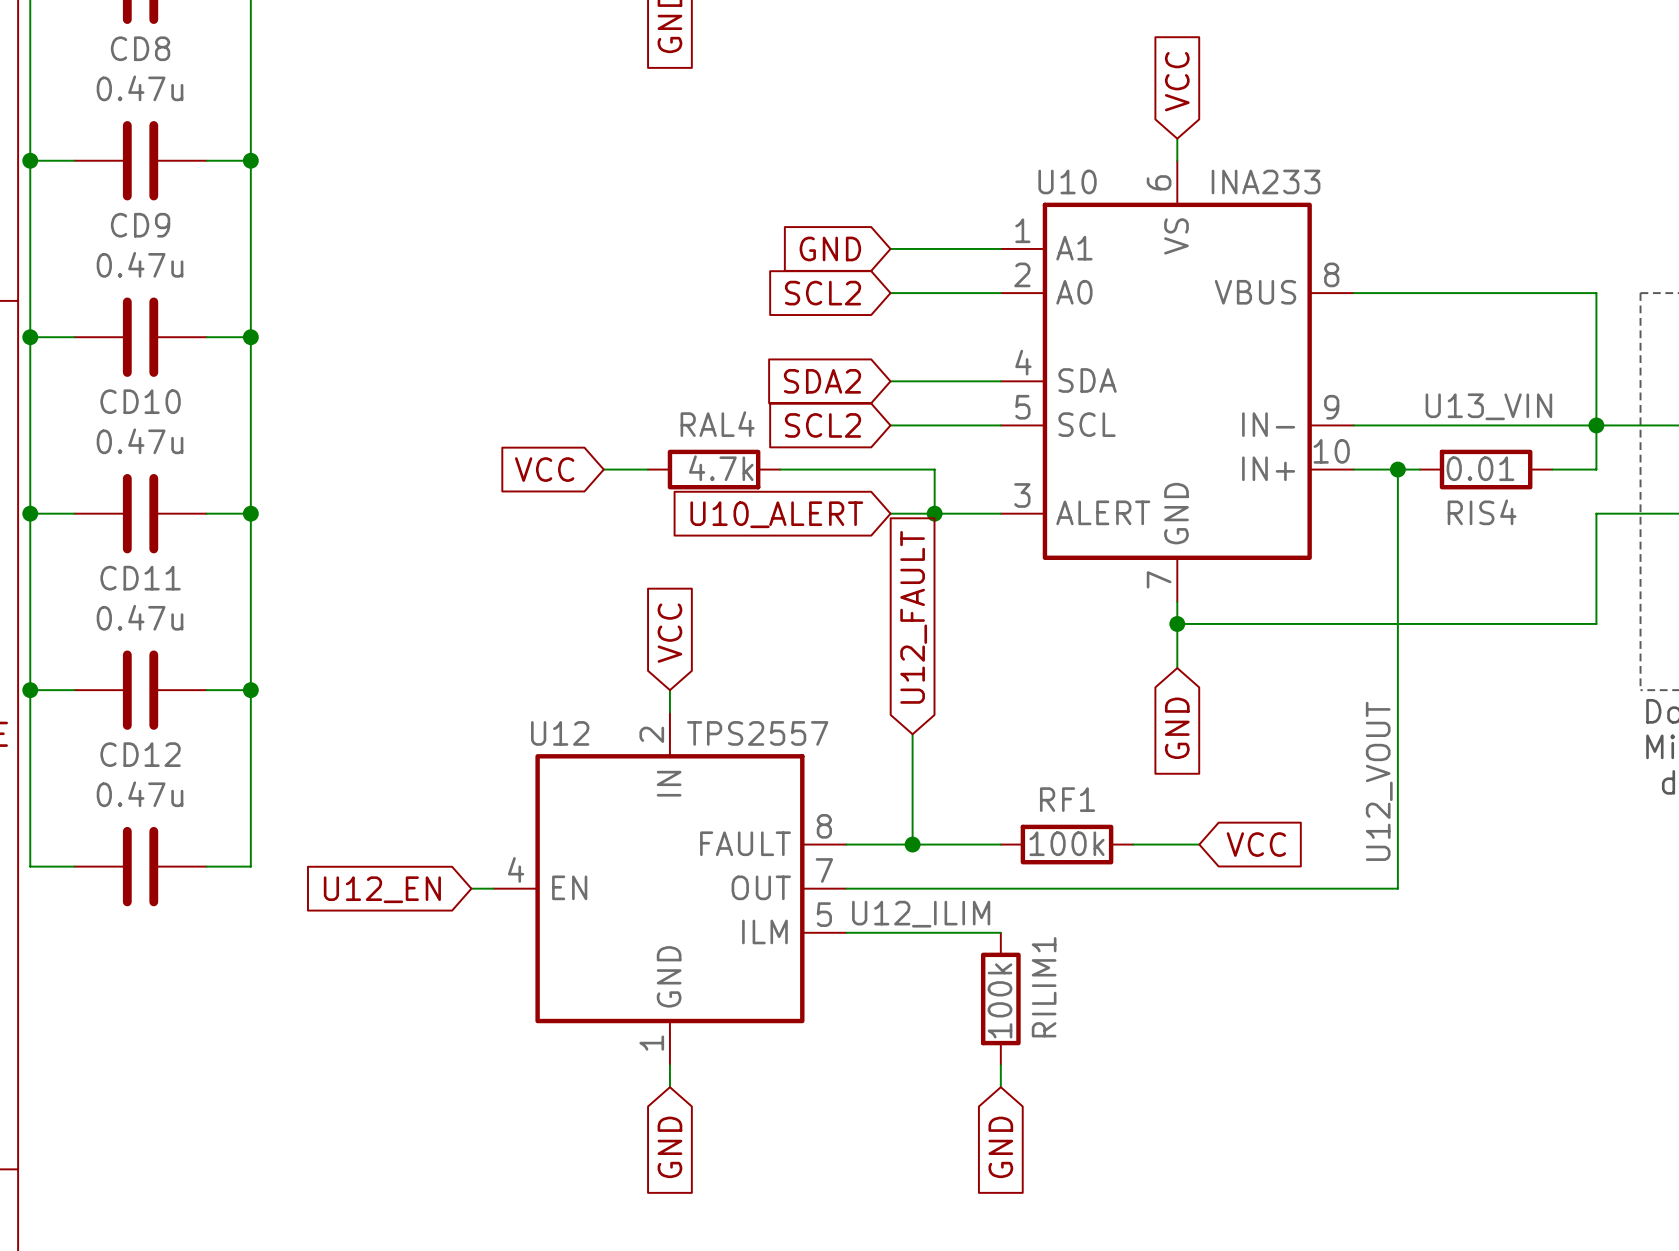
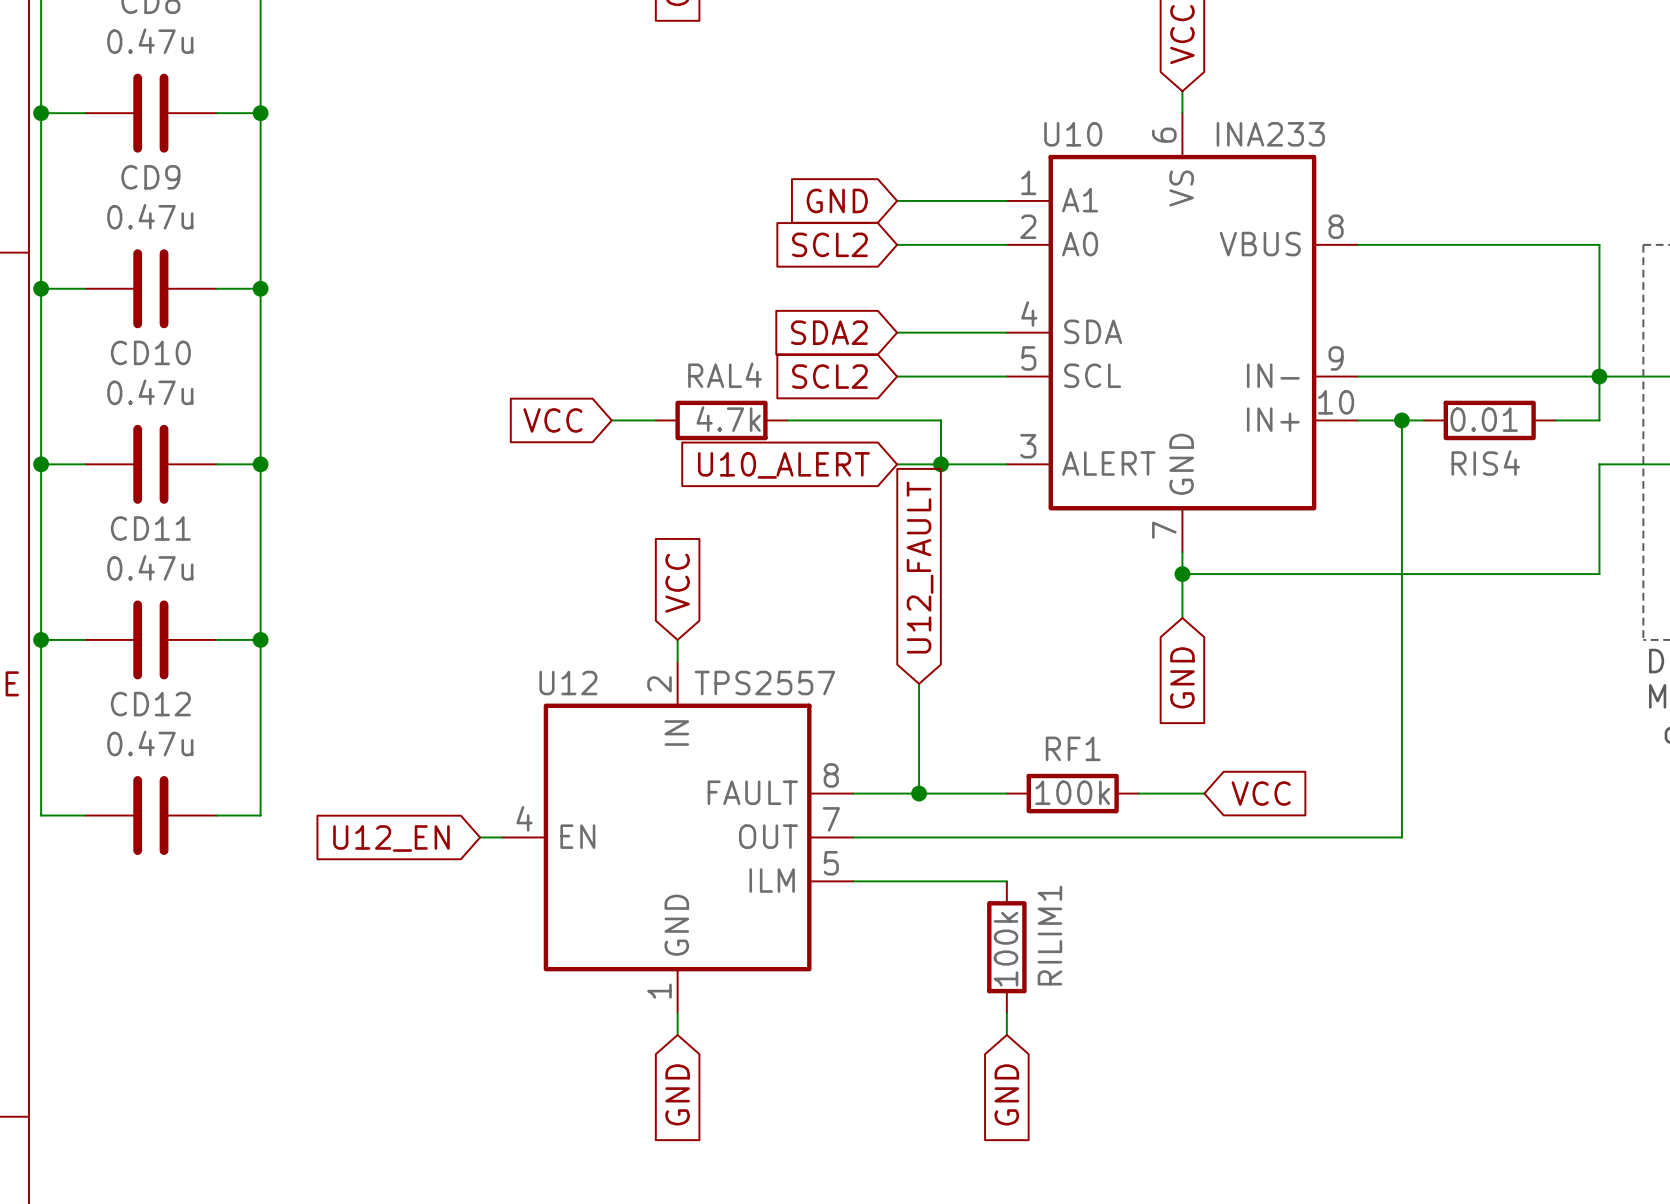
label: U13_VIN (1488, 406) -> none
label: U12_VOUT (1379, 781) -> none
label: U12_ILIM (921, 914) -> none

